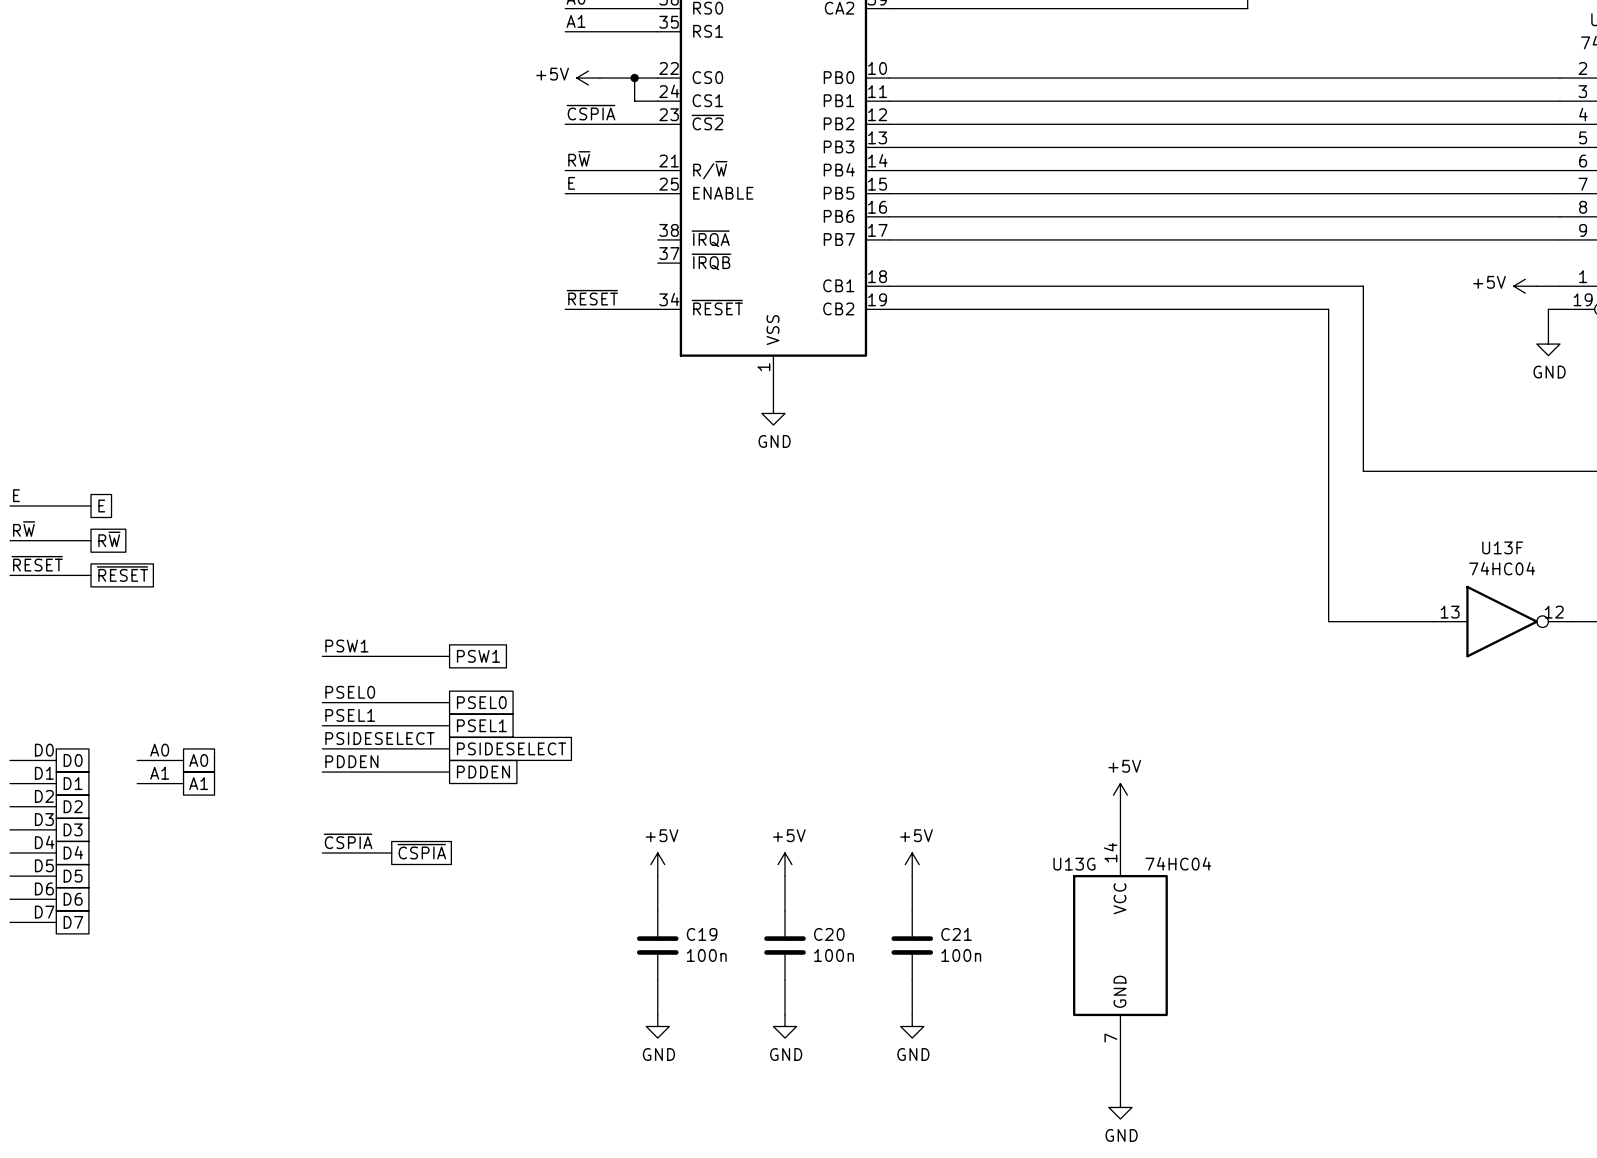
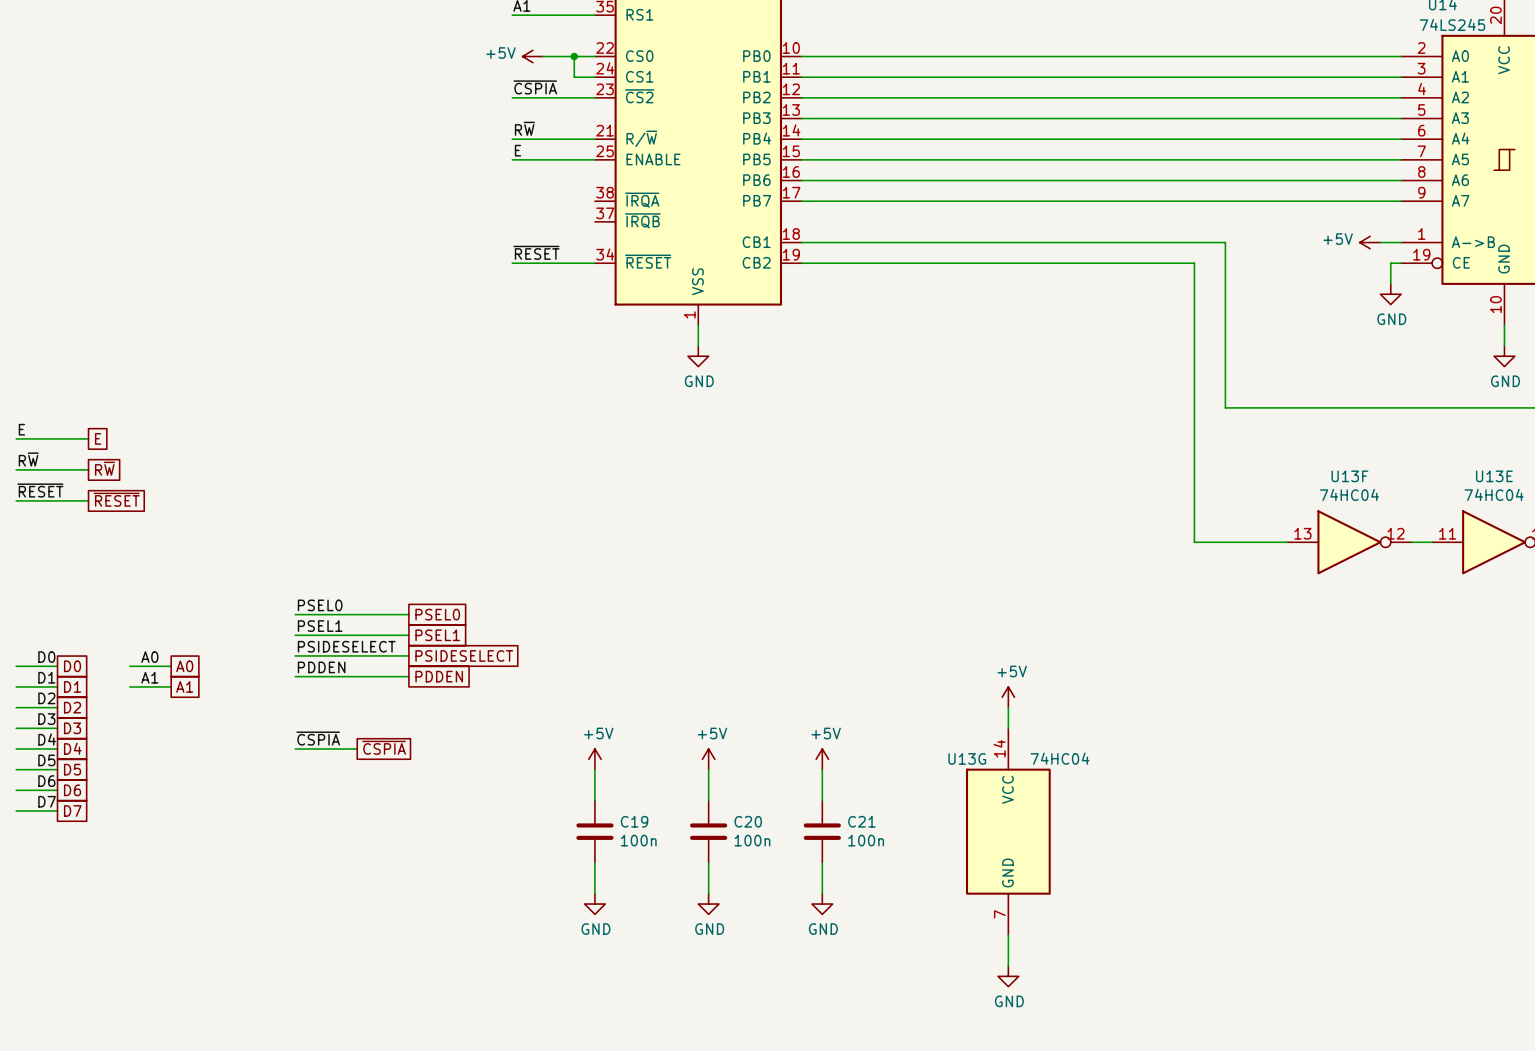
label: PSW1 (346, 646) -> none
wire: (322, 656) (449, 656) -> none
global label: PSW1 (478, 656) -> none

